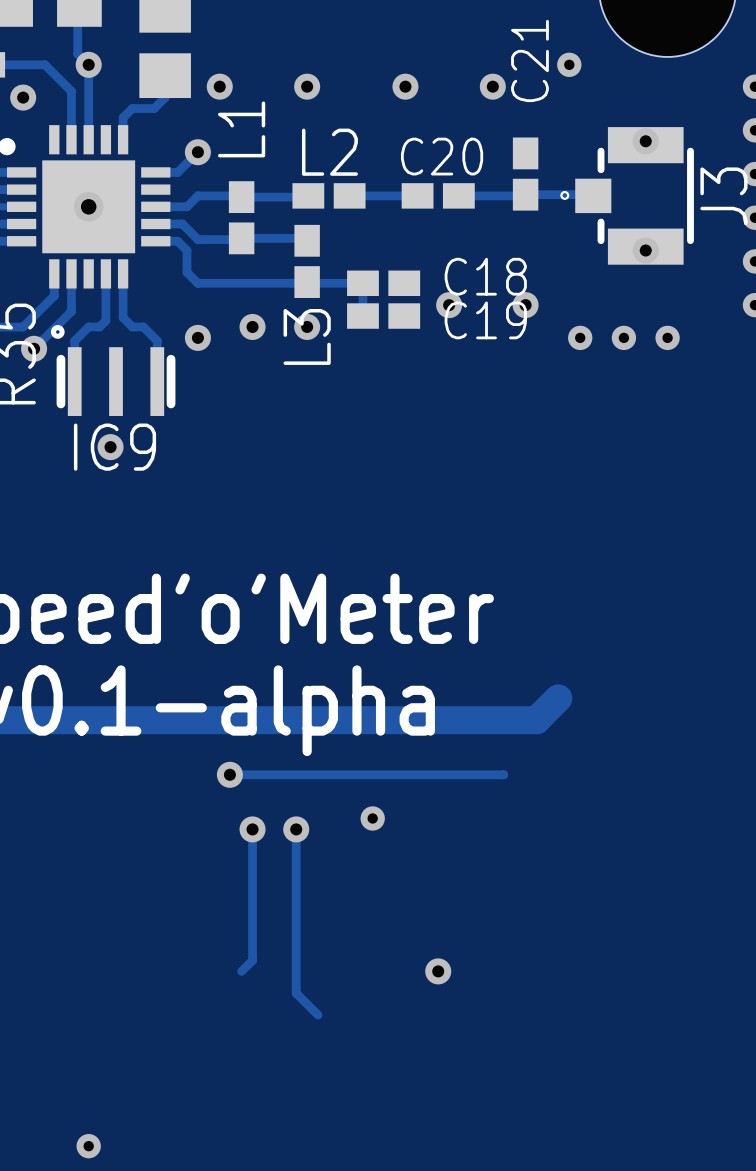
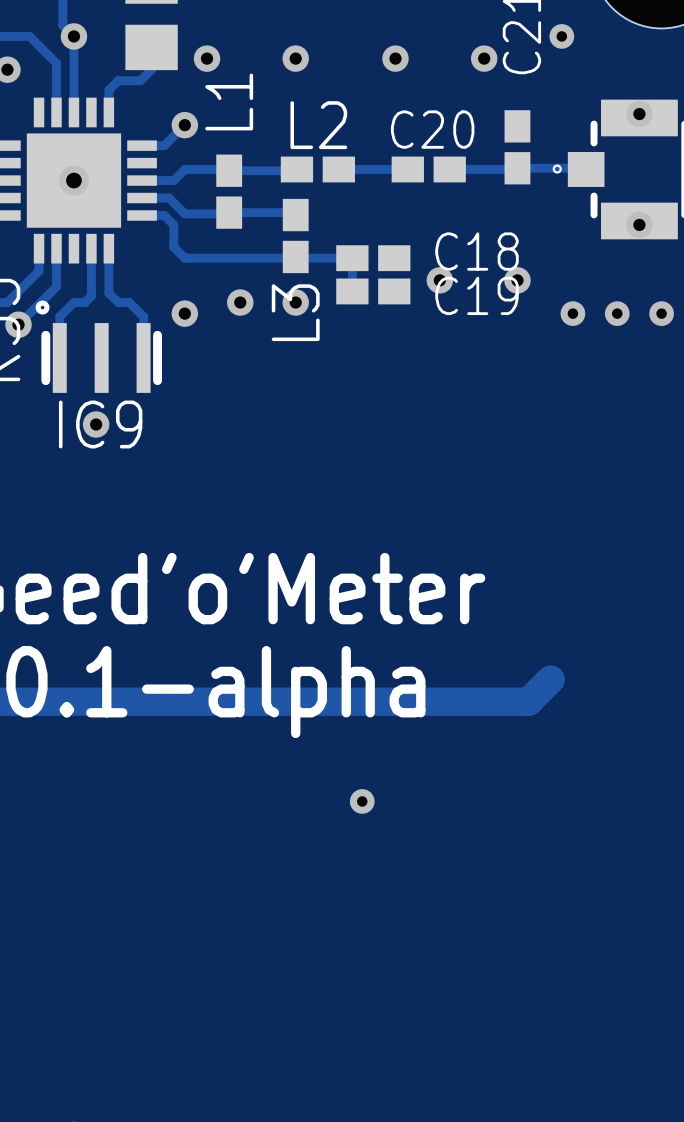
track: (229, 774) (503, 774) -> none
via: (229, 774) -> none
track: (252, 829) (252, 960) (241, 971) -> none
via: (252, 829) -> none
track: (296, 829) (296, 993) (318, 1015) -> none
via: (296, 829) -> none
via: (438, 971) -> none

